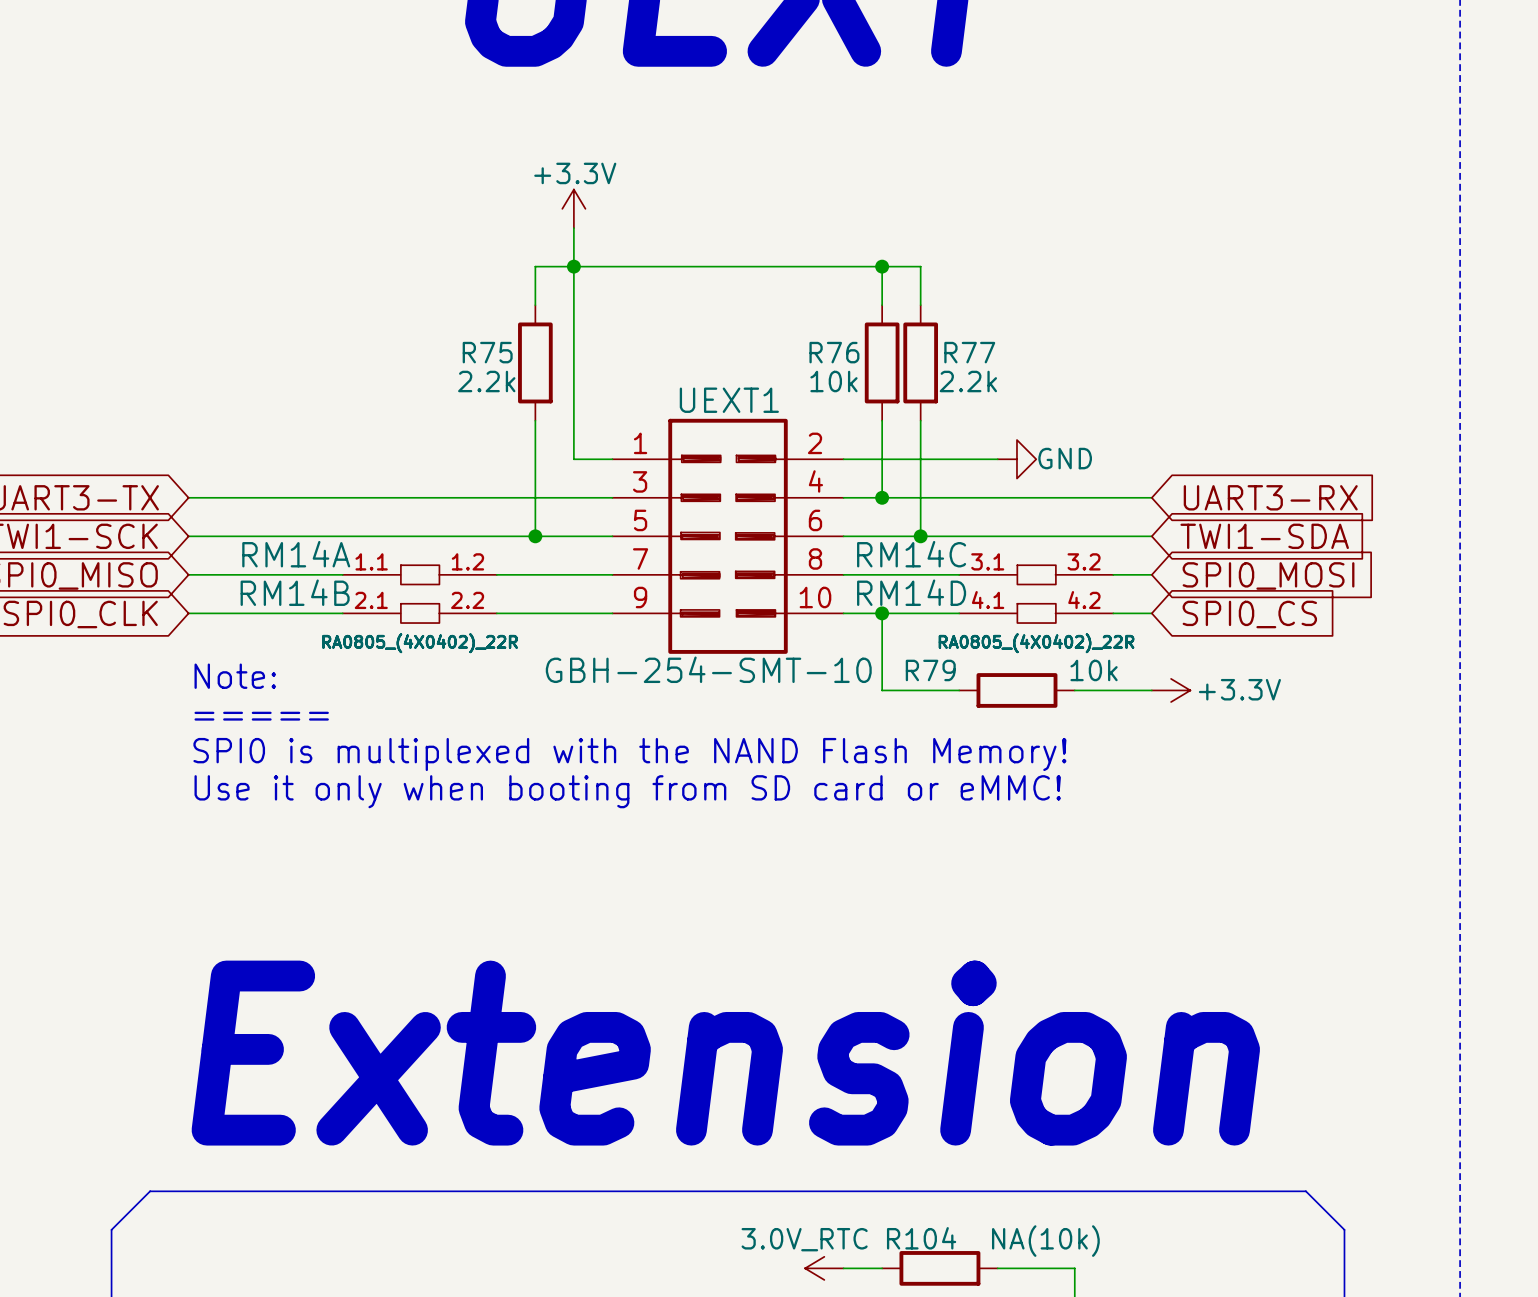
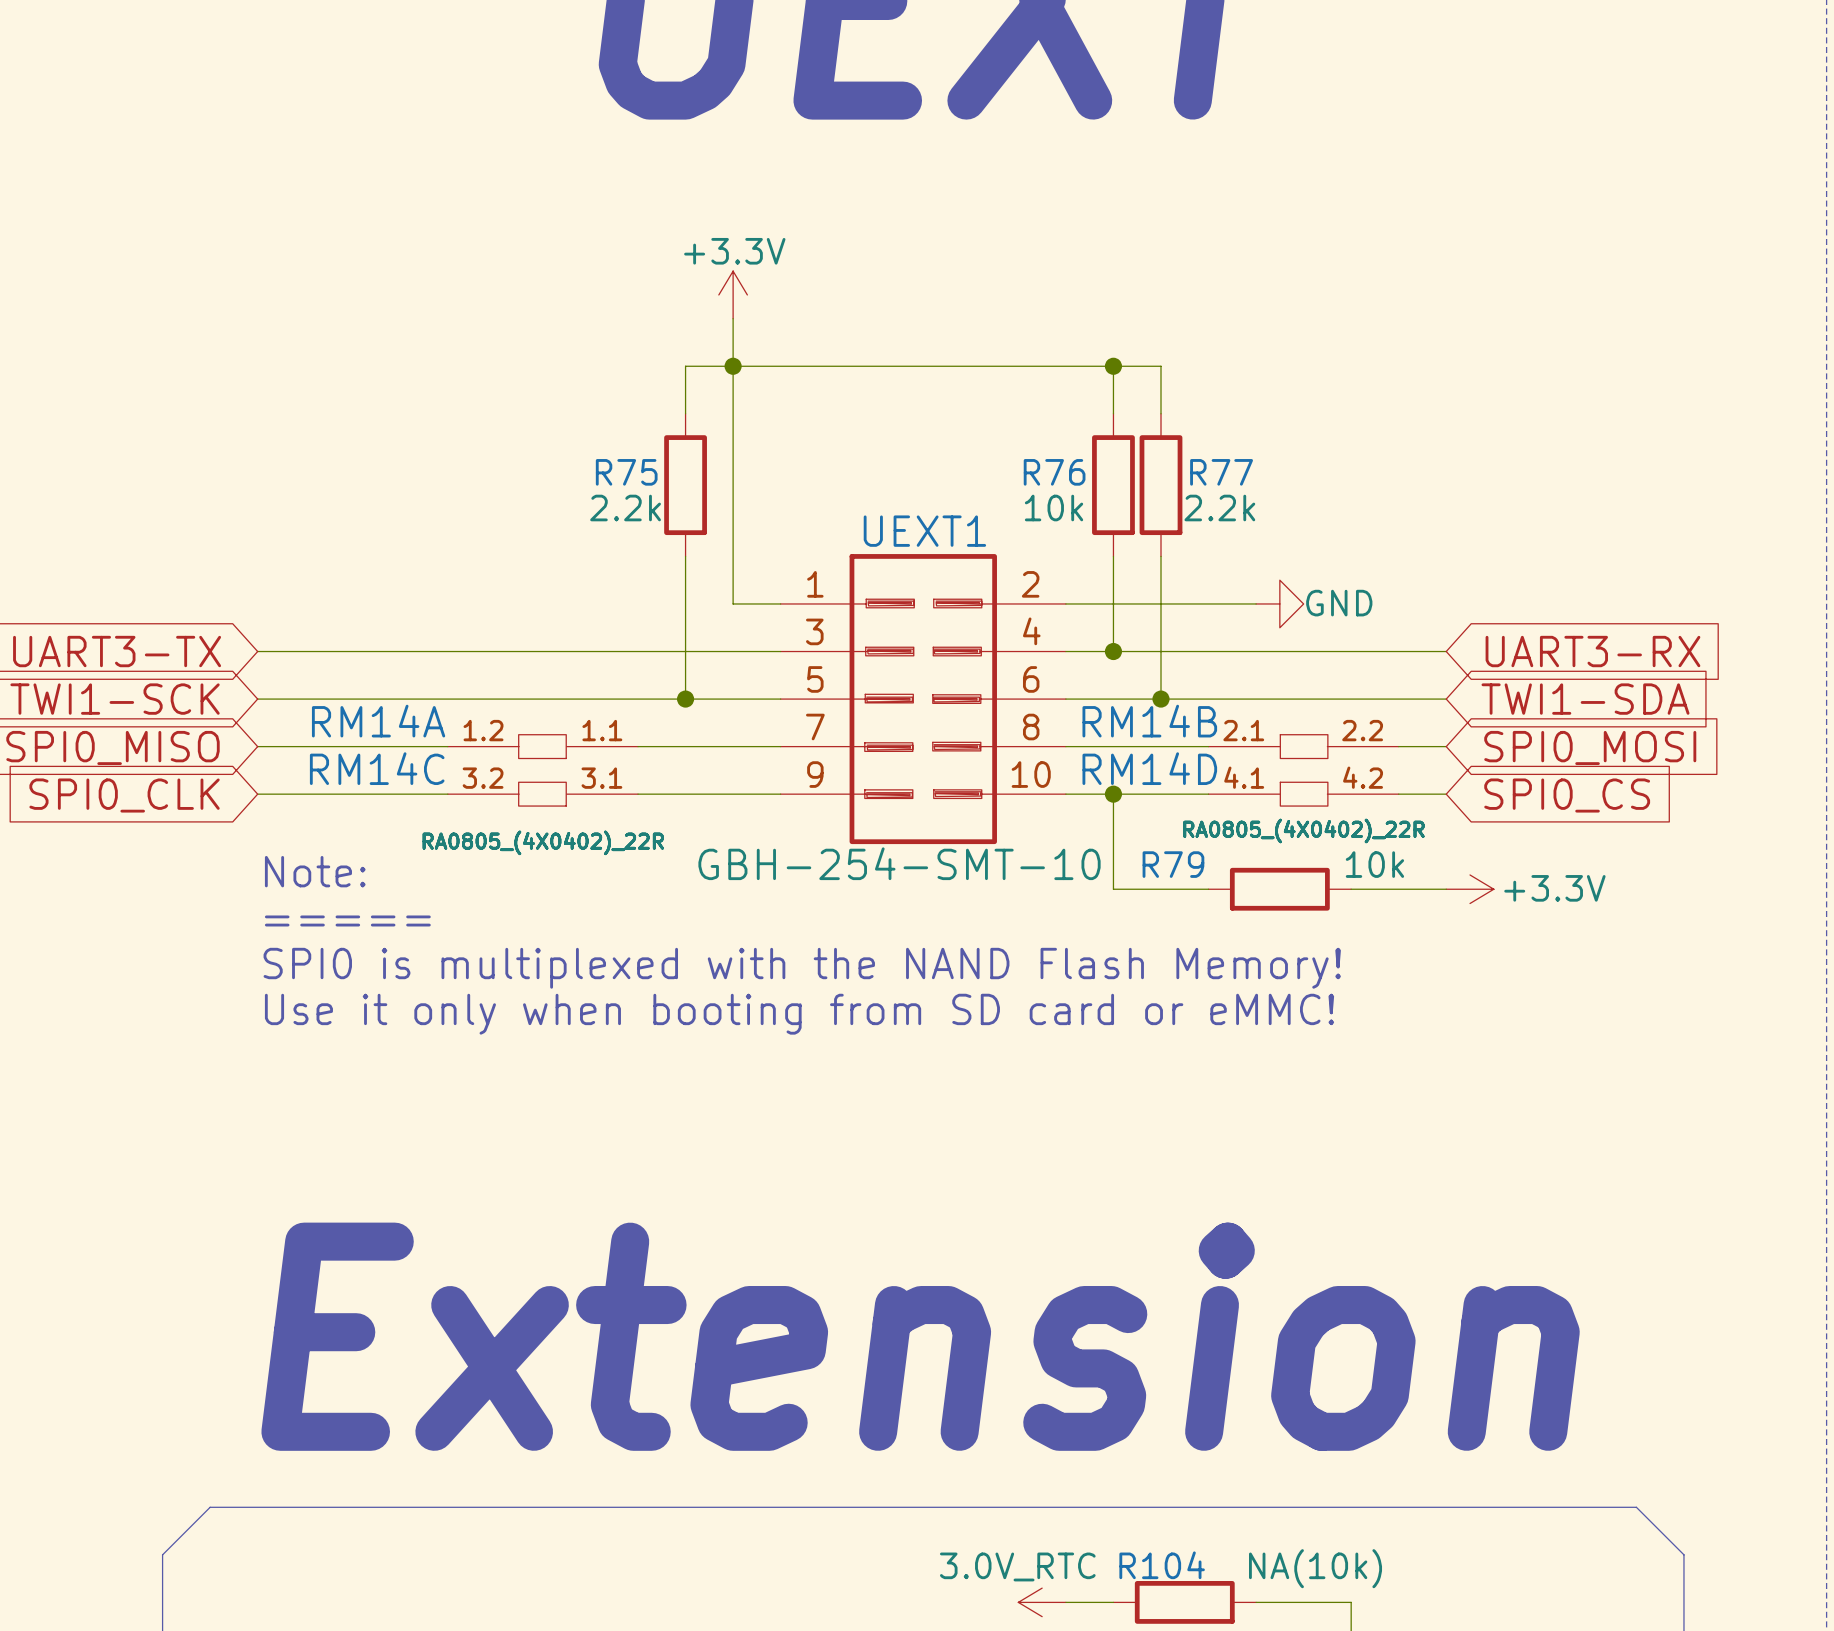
RM14A rotation: 0° (420, 574) -> 180° (542, 746)
RM14C rotation: 0° (1036, 574) -> 180° (542, 794)
RM14C position: (1036, 574) -> (542, 794)
RM14B position: (419, 613) -> (1303, 746)
RM14B value position: RA0805_(4X0402)_22R (420, 643) -> RA0805_(4X0402)_22R (1303, 830)

